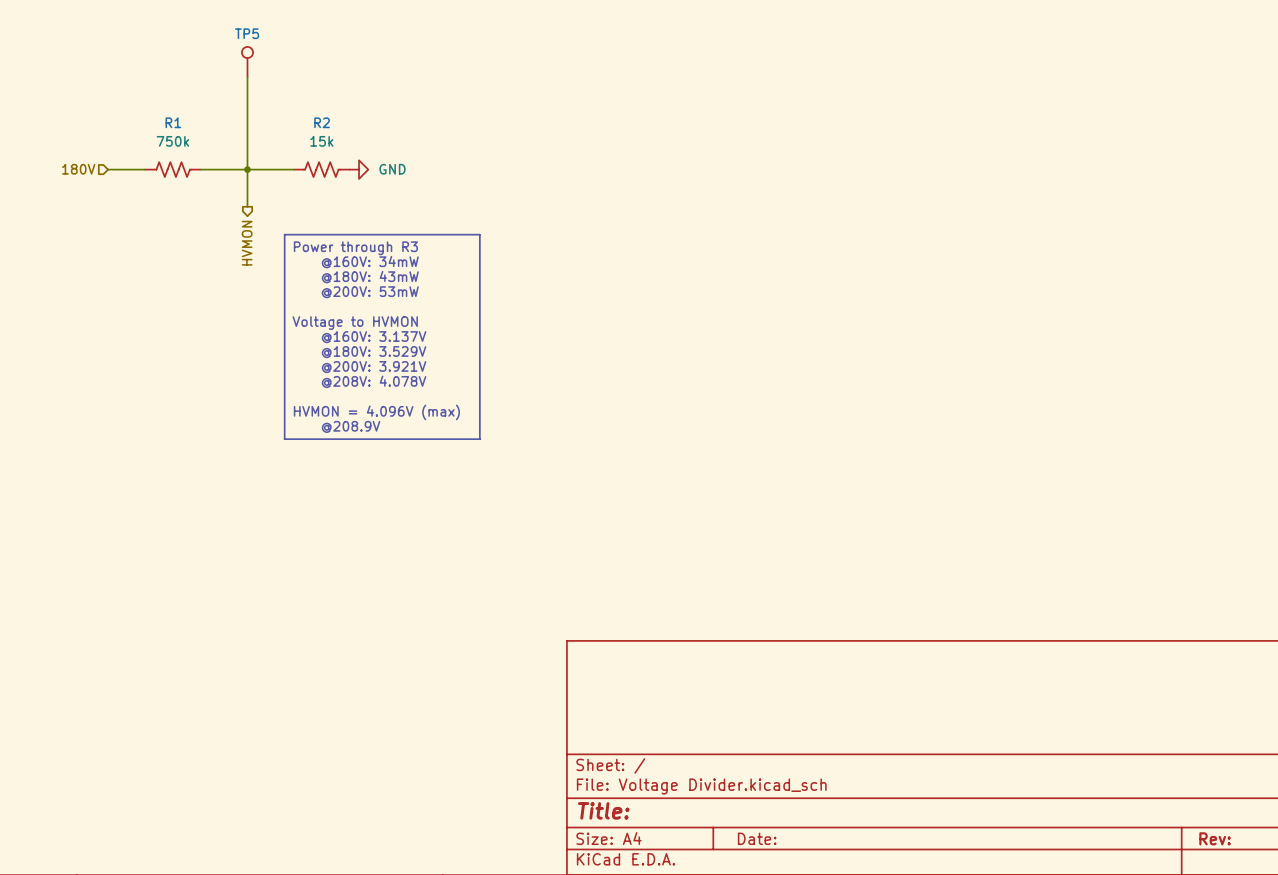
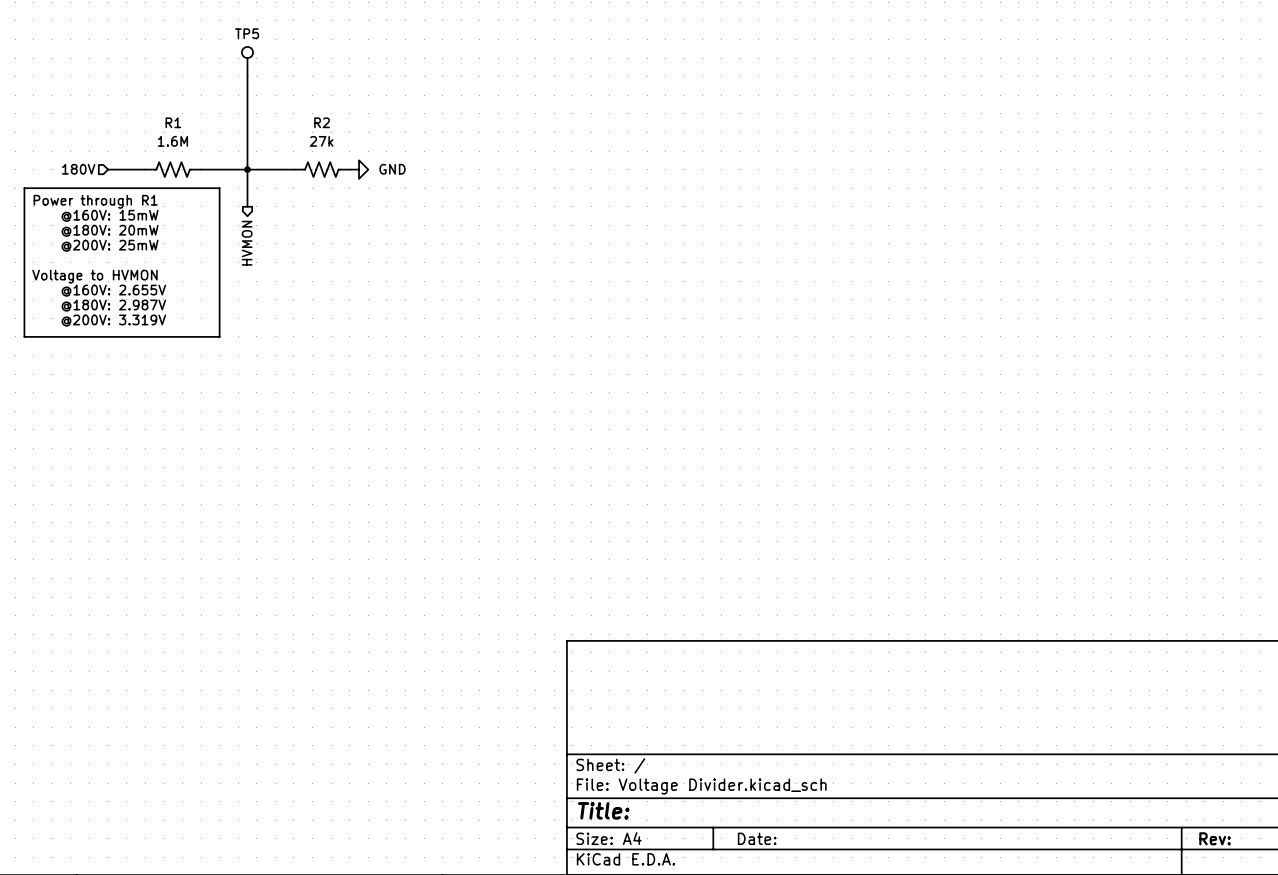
R1 value: 750k (172, 141) -> 1.6M (172, 141)
R2 value: 15k (321, 141) -> 27k (321, 141)
line: none -> (24, 188) (219, 188) (219, 336) (24, 336) (24, 188)
text: none -> Power through R1 (95, 201)
text: none -> @160V: 15mW (110, 215)
text: none -> @180V: 20mW (110, 230)
line: (284, 234) (479, 234) (479, 439) (284, 439) (284, 234) -> none
text: none -> @200V: 25mW (110, 245)
text: Power through R3 (355, 248) -> none
text: @160V: 34mW (370, 262) -> none
text: none -> Voltage to HVMON (94, 276)
text: @180V: 43mW (370, 277) -> none
text: none -> @160V: 2.655V (113, 290)
text: @200V: 53mW (370, 292) -> none
text: none -> @180V: 2.987V (113, 305)
text: none -> @200V: 3.319V (113, 320)
text: Voltage to HVMON (355, 323) -> none
text: @160V: 3.137V (374, 337) -> none
text: @180V: 3.529V (374, 352) -> none
text: @200V: 3.921V (374, 367) -> none
text: @208V: 4.078V (374, 381) -> none
text: HVMON = 4.096V (max) (376, 412) -> none
text: @208.9V (351, 426) -> none

